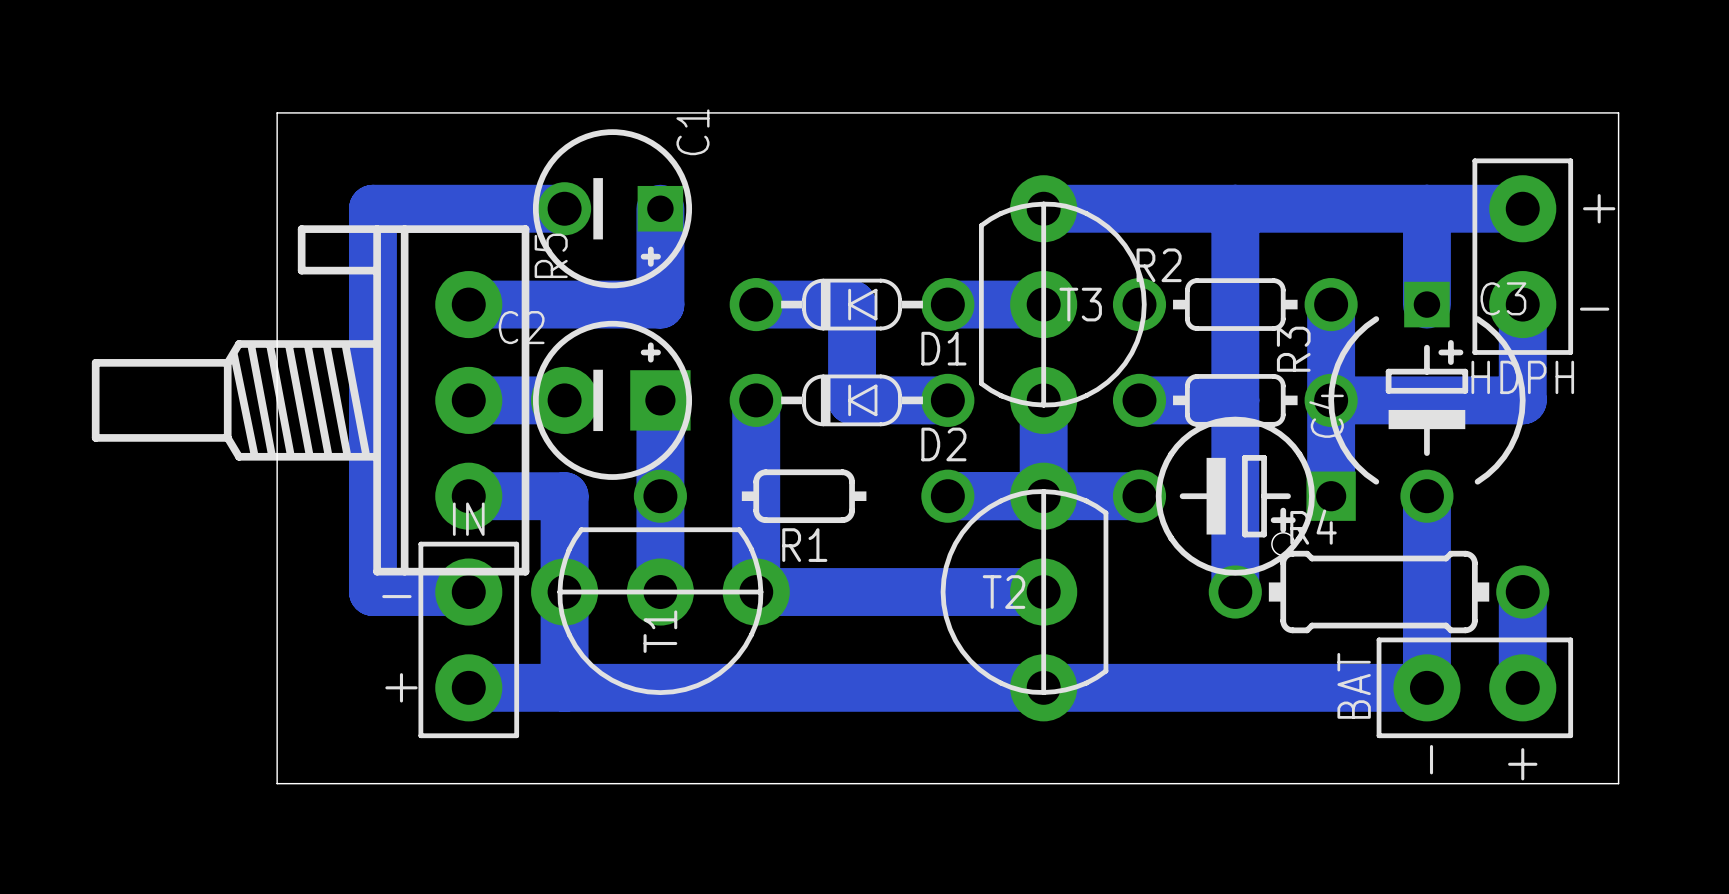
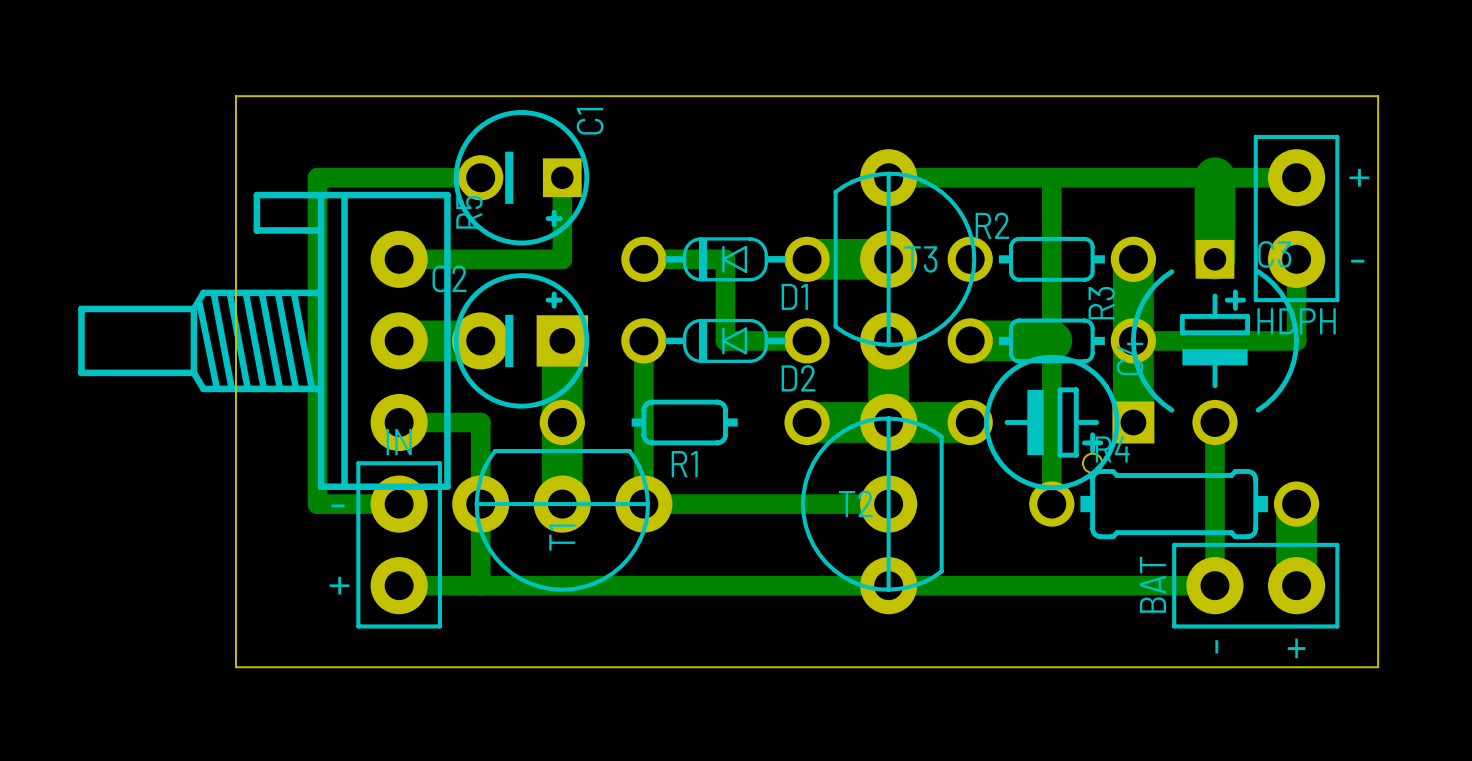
bottom track width: thick (564, 208) (372, 208) (372, 592) (468, 592) -> thin (480, 177) (317, 177) (317, 504) (399, 504)
bottom track width: thick (660, 208) (660, 304) (468, 304) -> thin (562, 177) (562, 259) (399, 259)
bottom track width: thick (1043, 208) (1522, 208) -> thin (888, 177) (1296, 177)
bottom track width: thick (1235, 208) (1235, 592) -> thin (1051, 177) (1051, 504)
bottom track width: thick (756, 304) (852, 304) (852, 400) (947, 400) -> thin (643, 259) (725, 259) (725, 340) (807, 340)
bottom track width: thick (1522, 304) (1522, 400) (1331, 400) -> thin (1296, 259) (1296, 340) (1133, 340)
bottom track width: thick (756, 400) (756, 592) (1043, 592) -> thin (643, 340) (643, 504) (888, 504)
bottom track width: thick (468, 496) (564, 496) (564, 687) -> thin (399, 422) (480, 422) (480, 585)
bottom track width: thick (1426, 496) (1426, 687) (468, 687) -> thin (1214, 422) (1214, 585) (399, 585)

